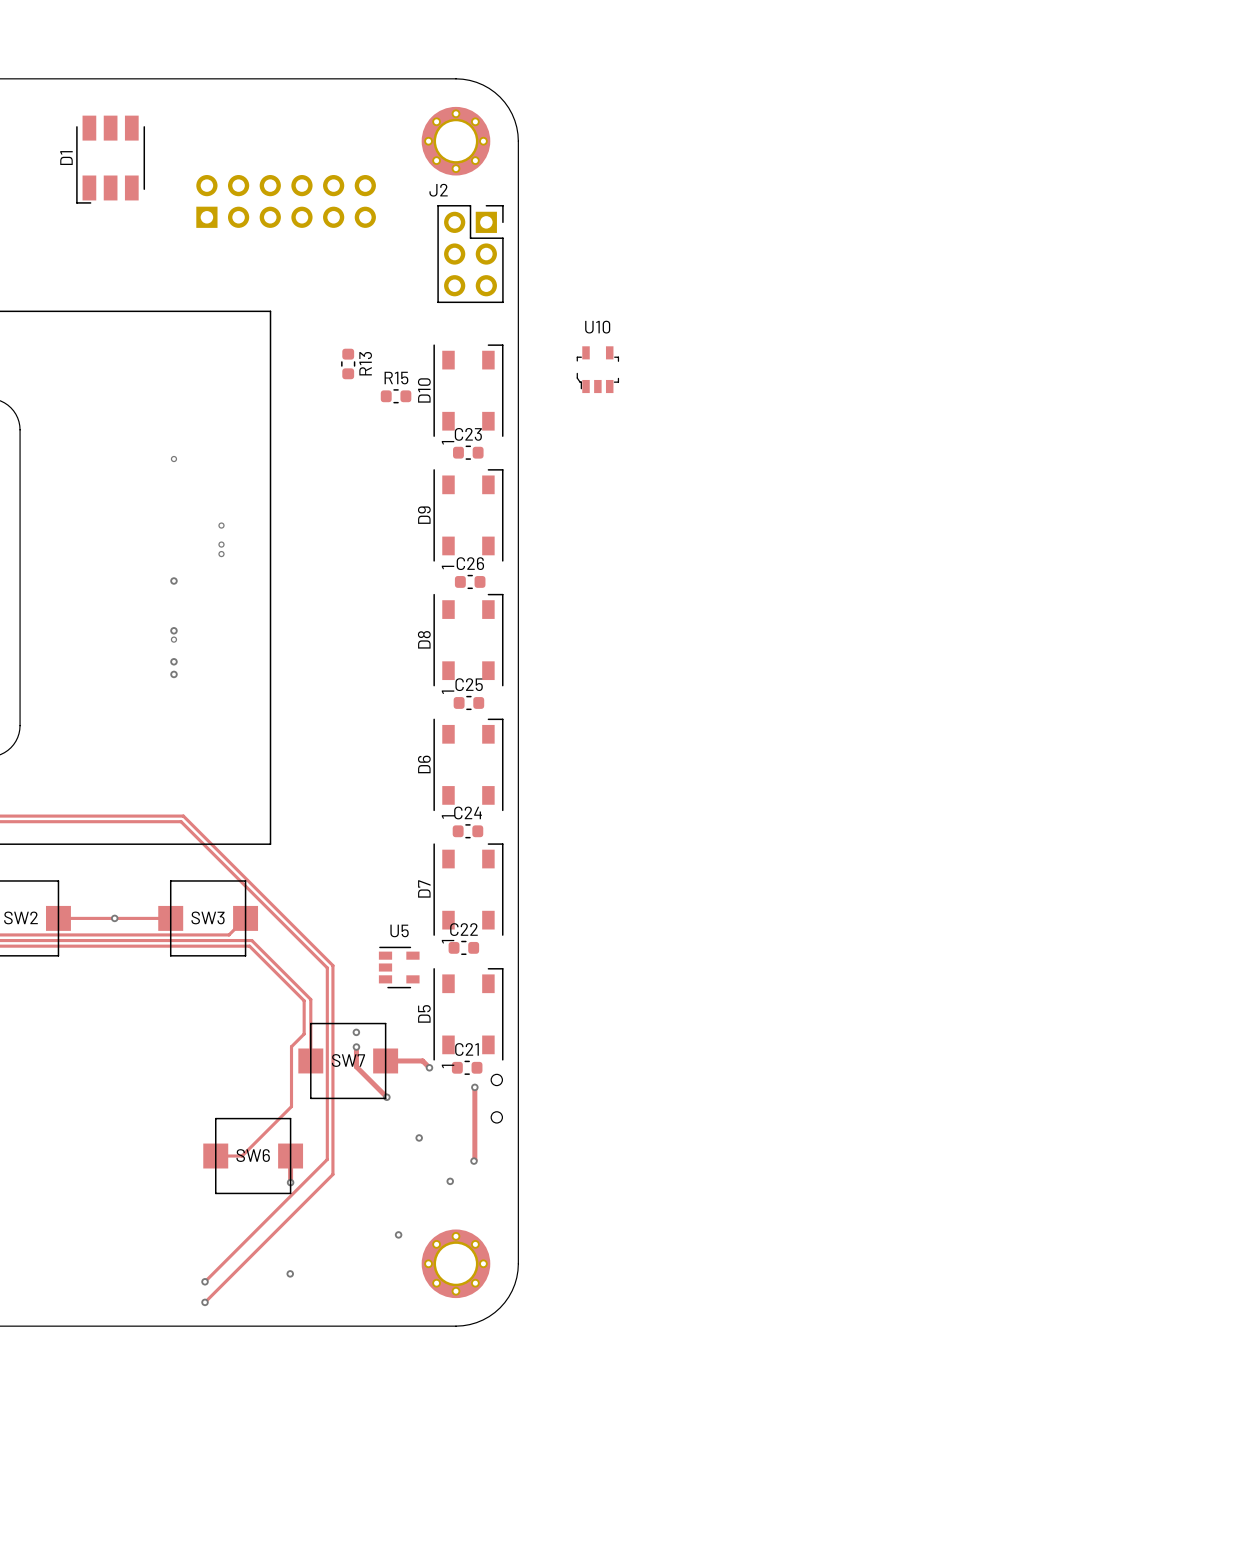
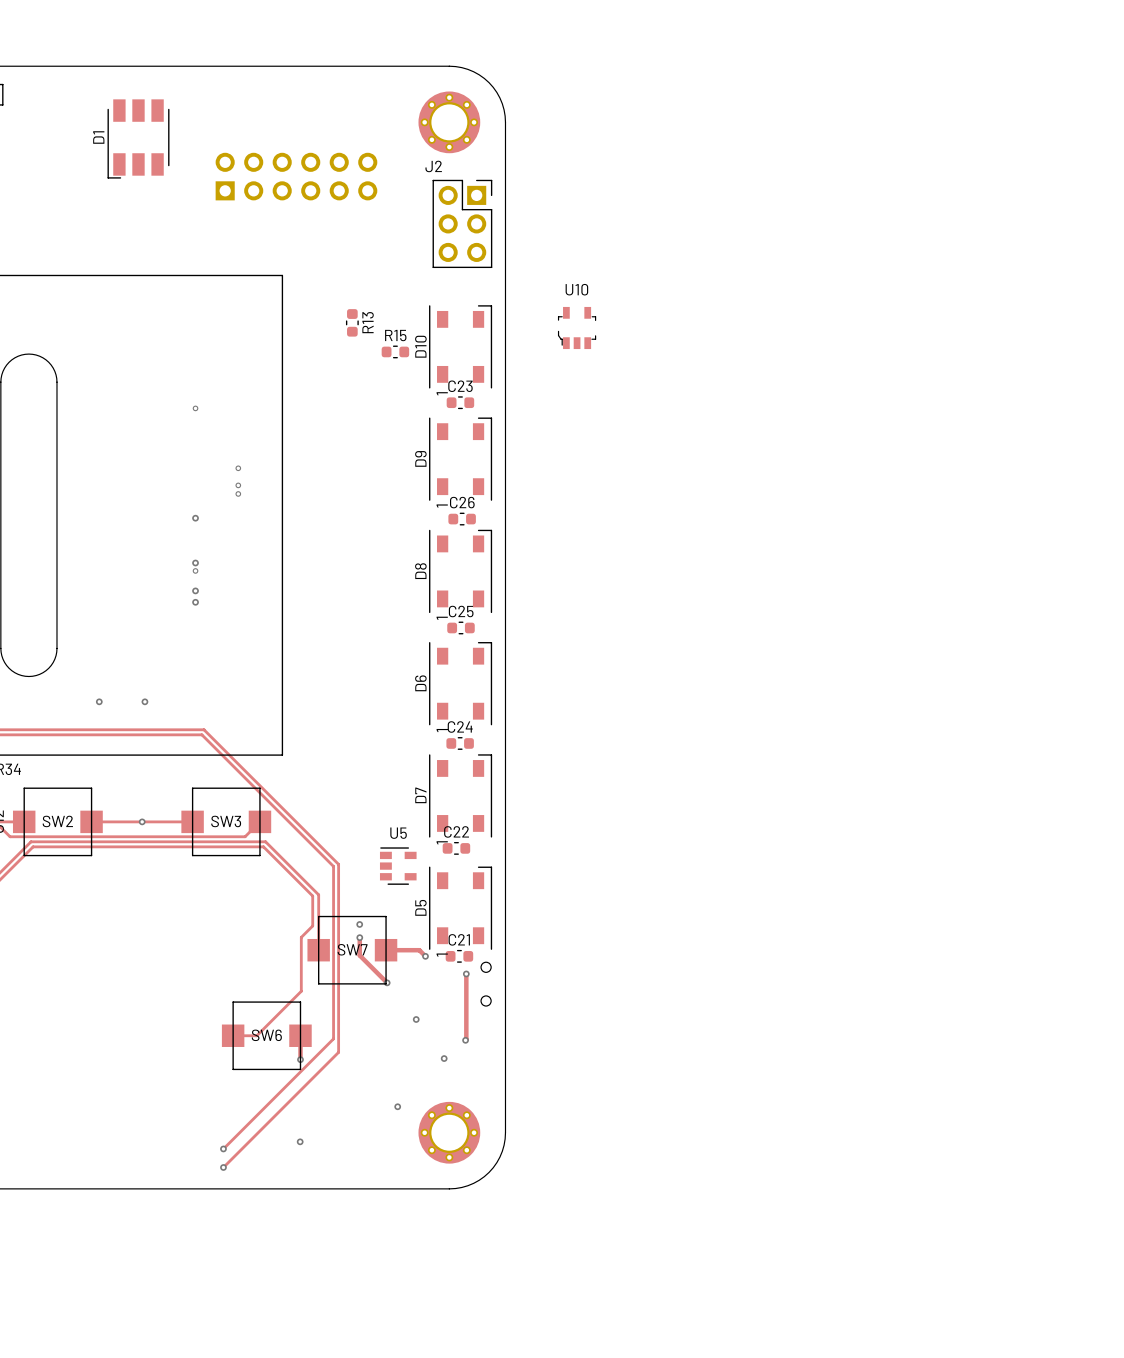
via: none -> (99, 701)
via: none -> (144, 701)

